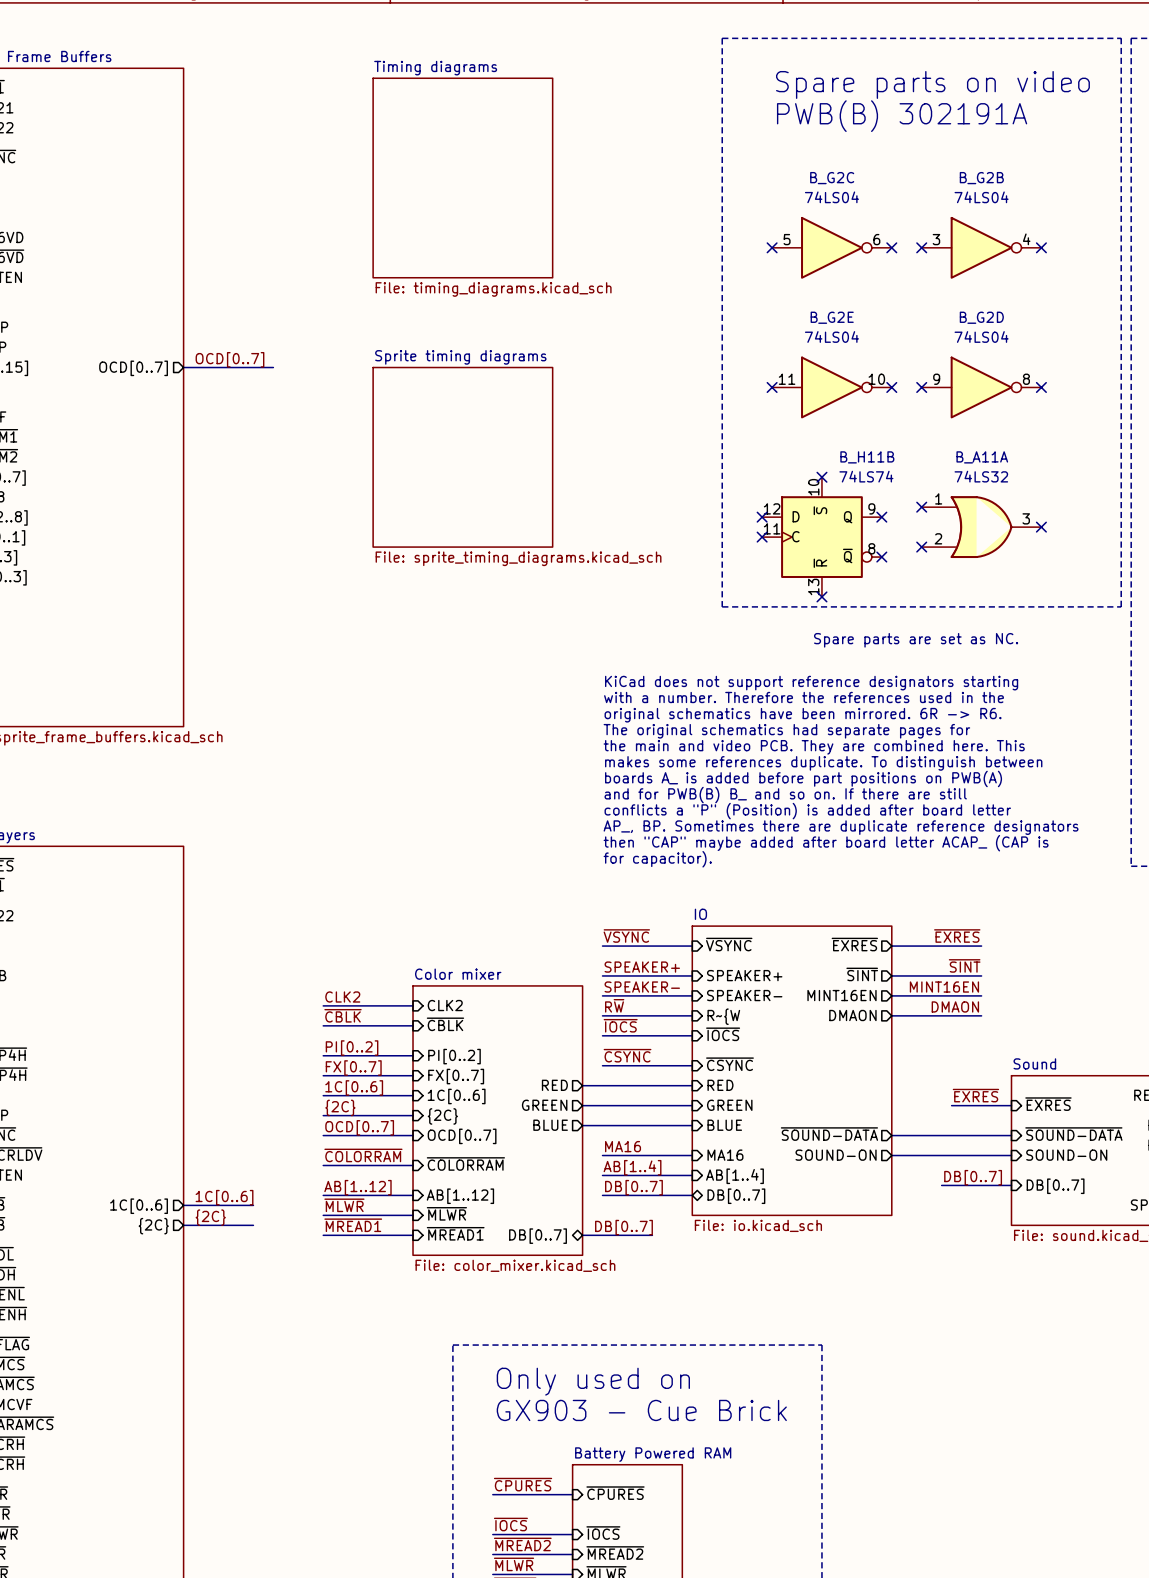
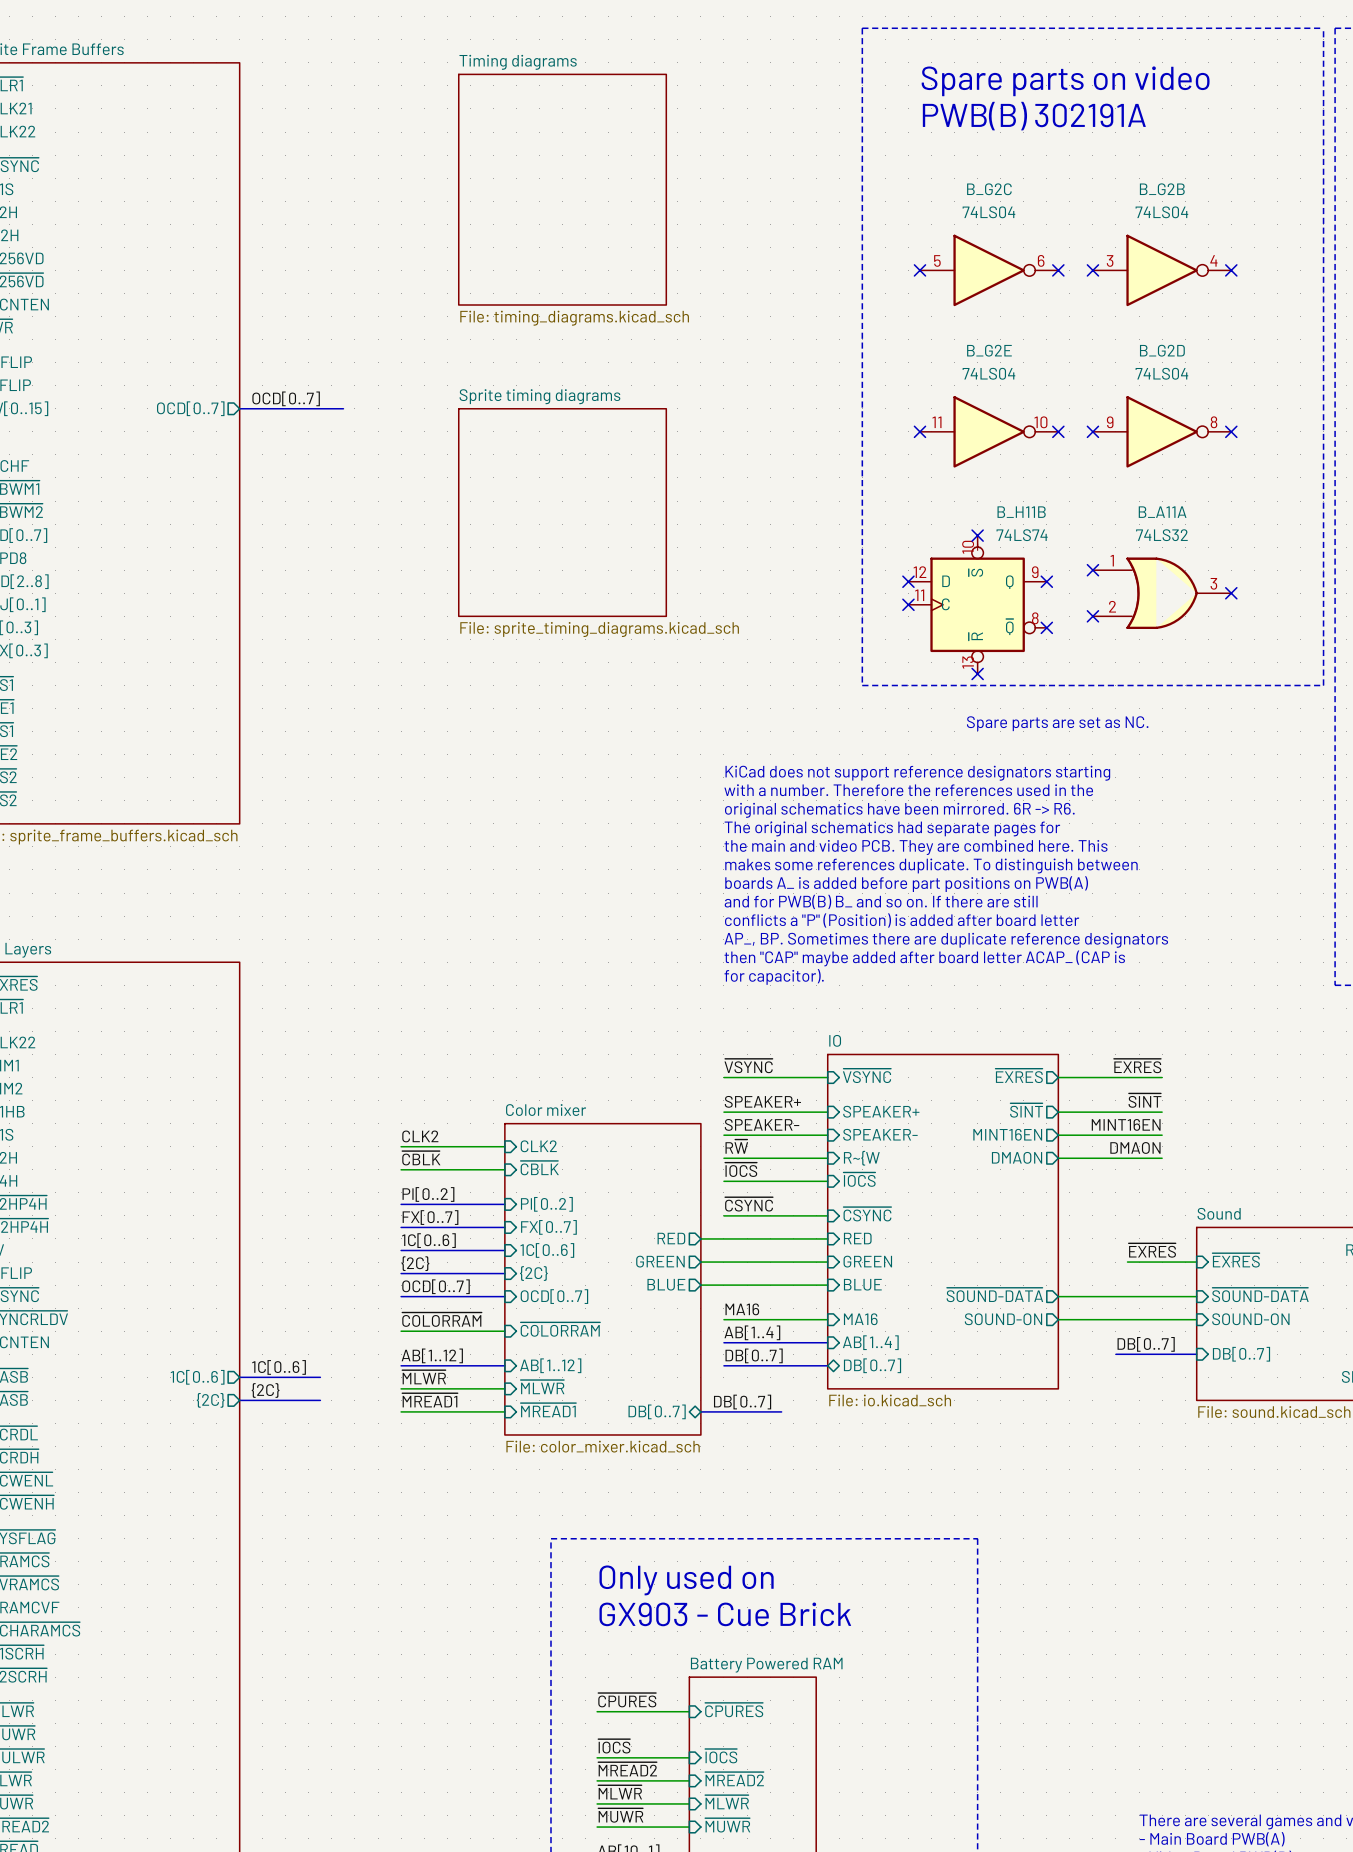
B_H11B symbol: [762, 477, 882, 597] -> [908, 535, 1047, 674]

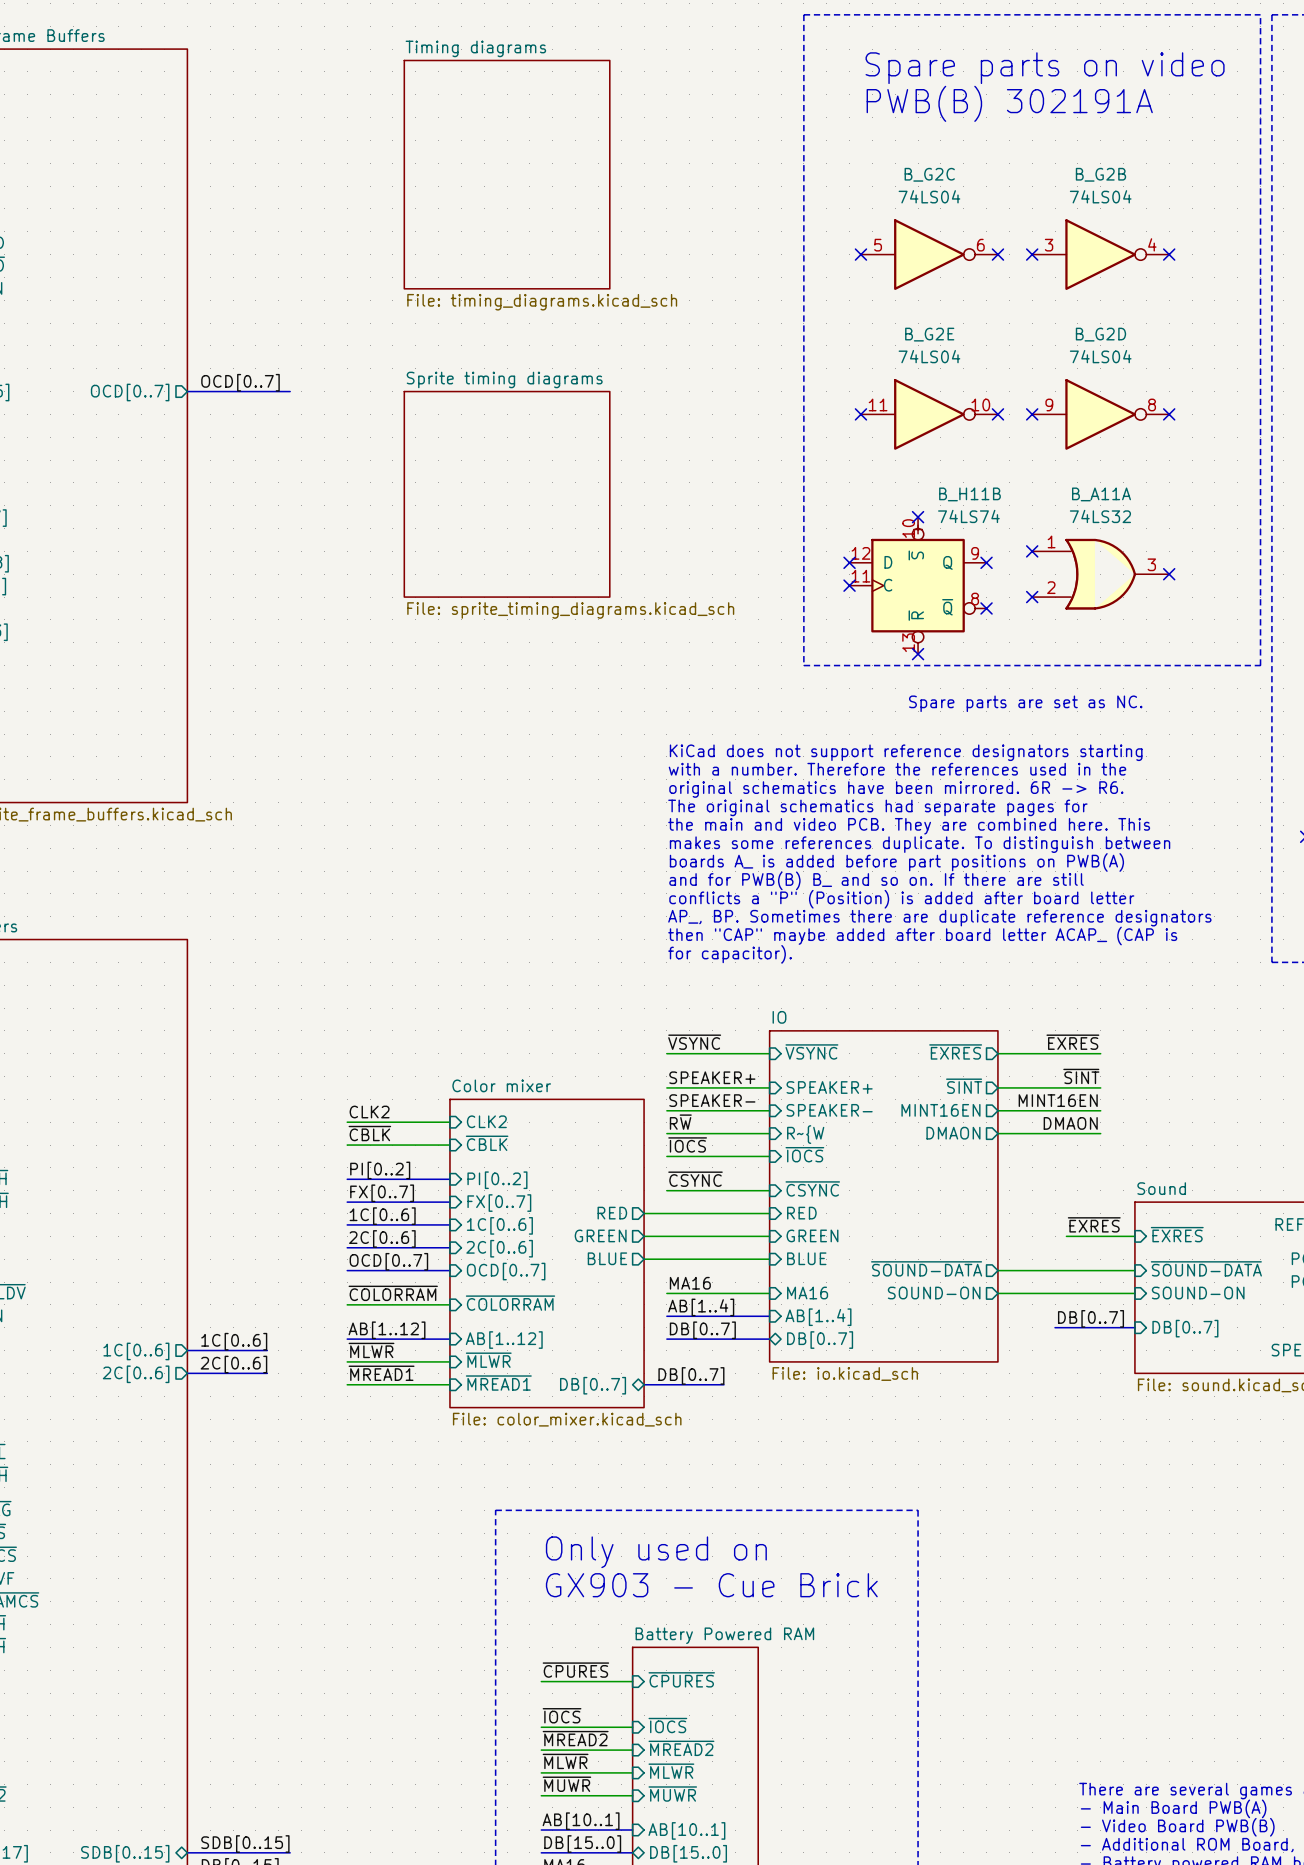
label: {2C} (415, 1263) -> 2C[0..6] (382, 1238)
sheet pin: {2C} (533, 1273) -> 2C[0..6] (499, 1248)
label: {2C} (265, 1390) -> 2C[0..6] (233, 1364)
sheet pin: {2C} (210, 1400) -> 2C[0..6] (136, 1374)

